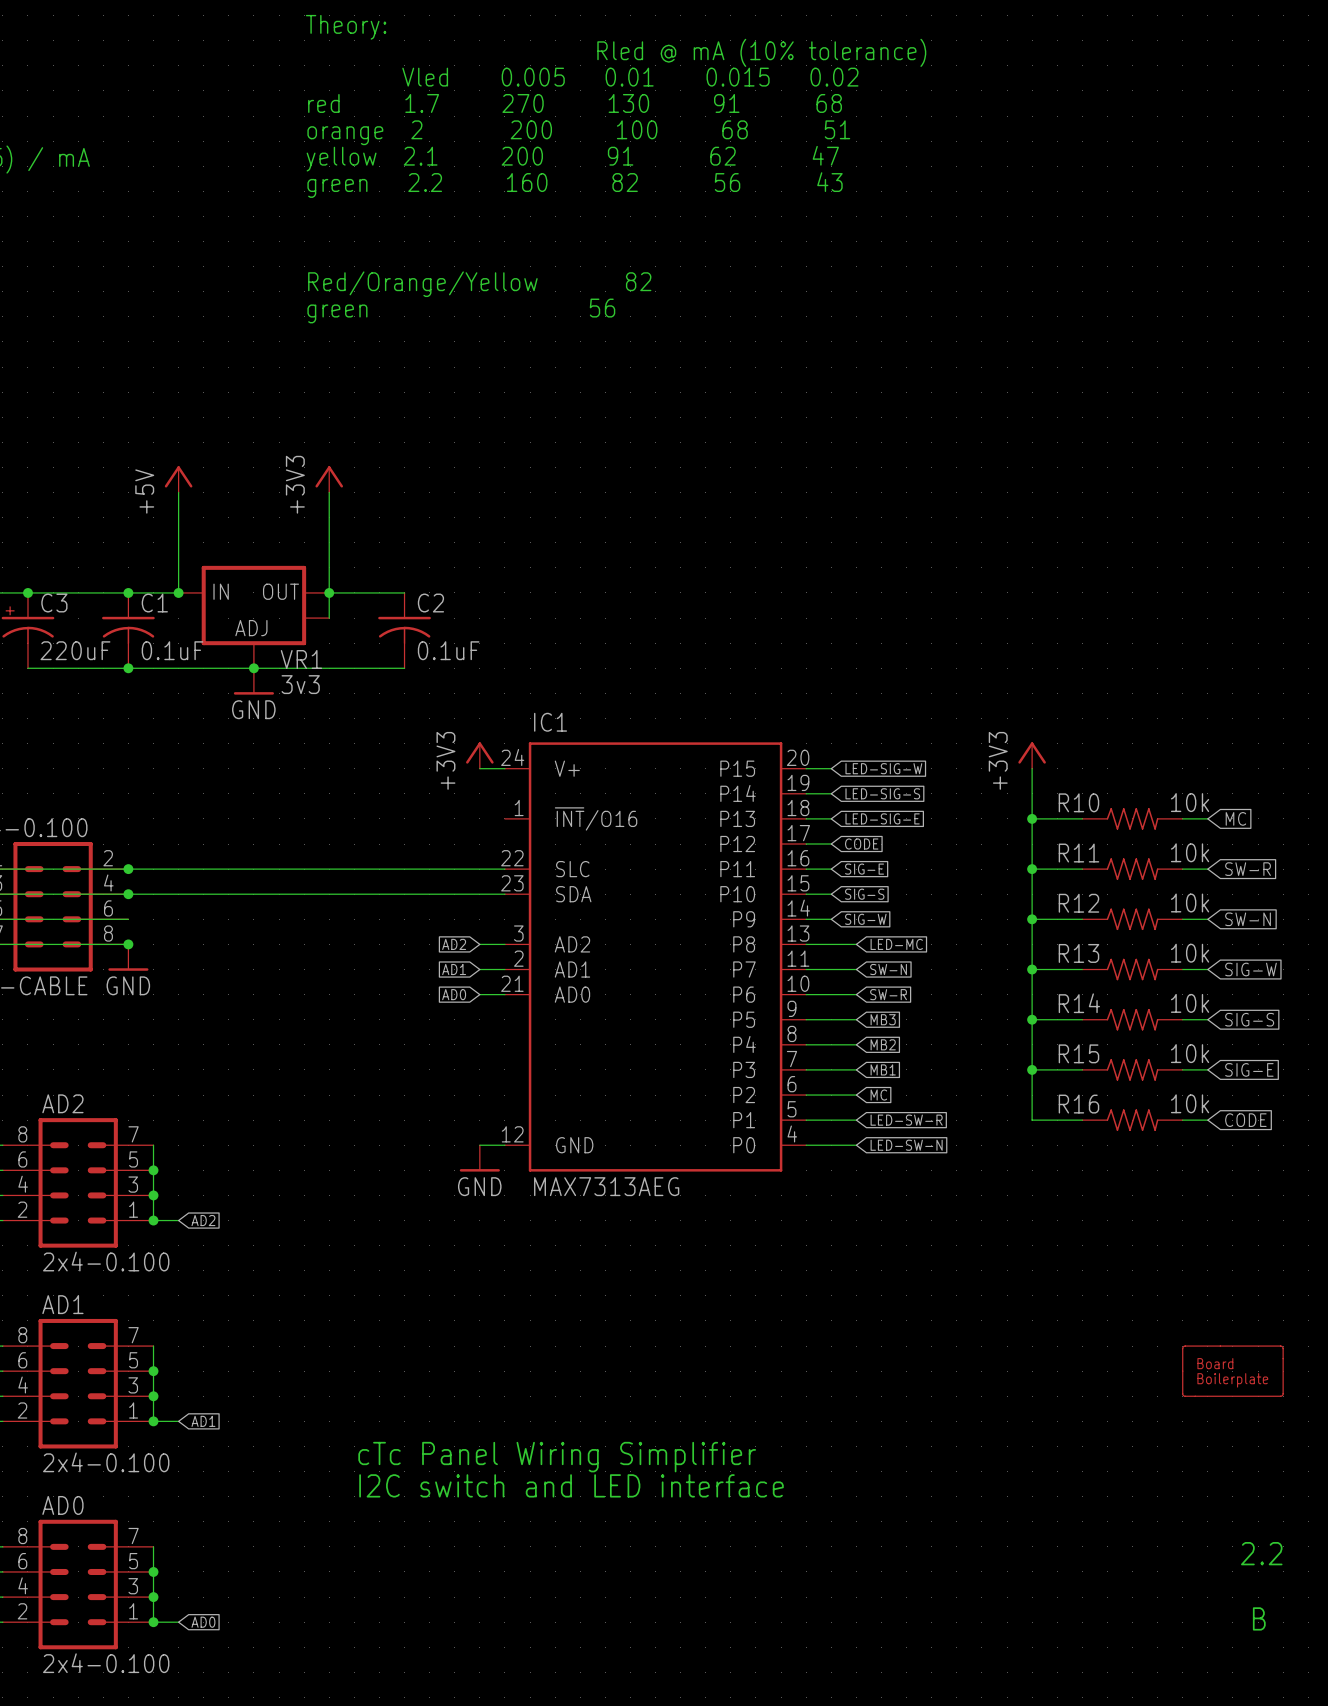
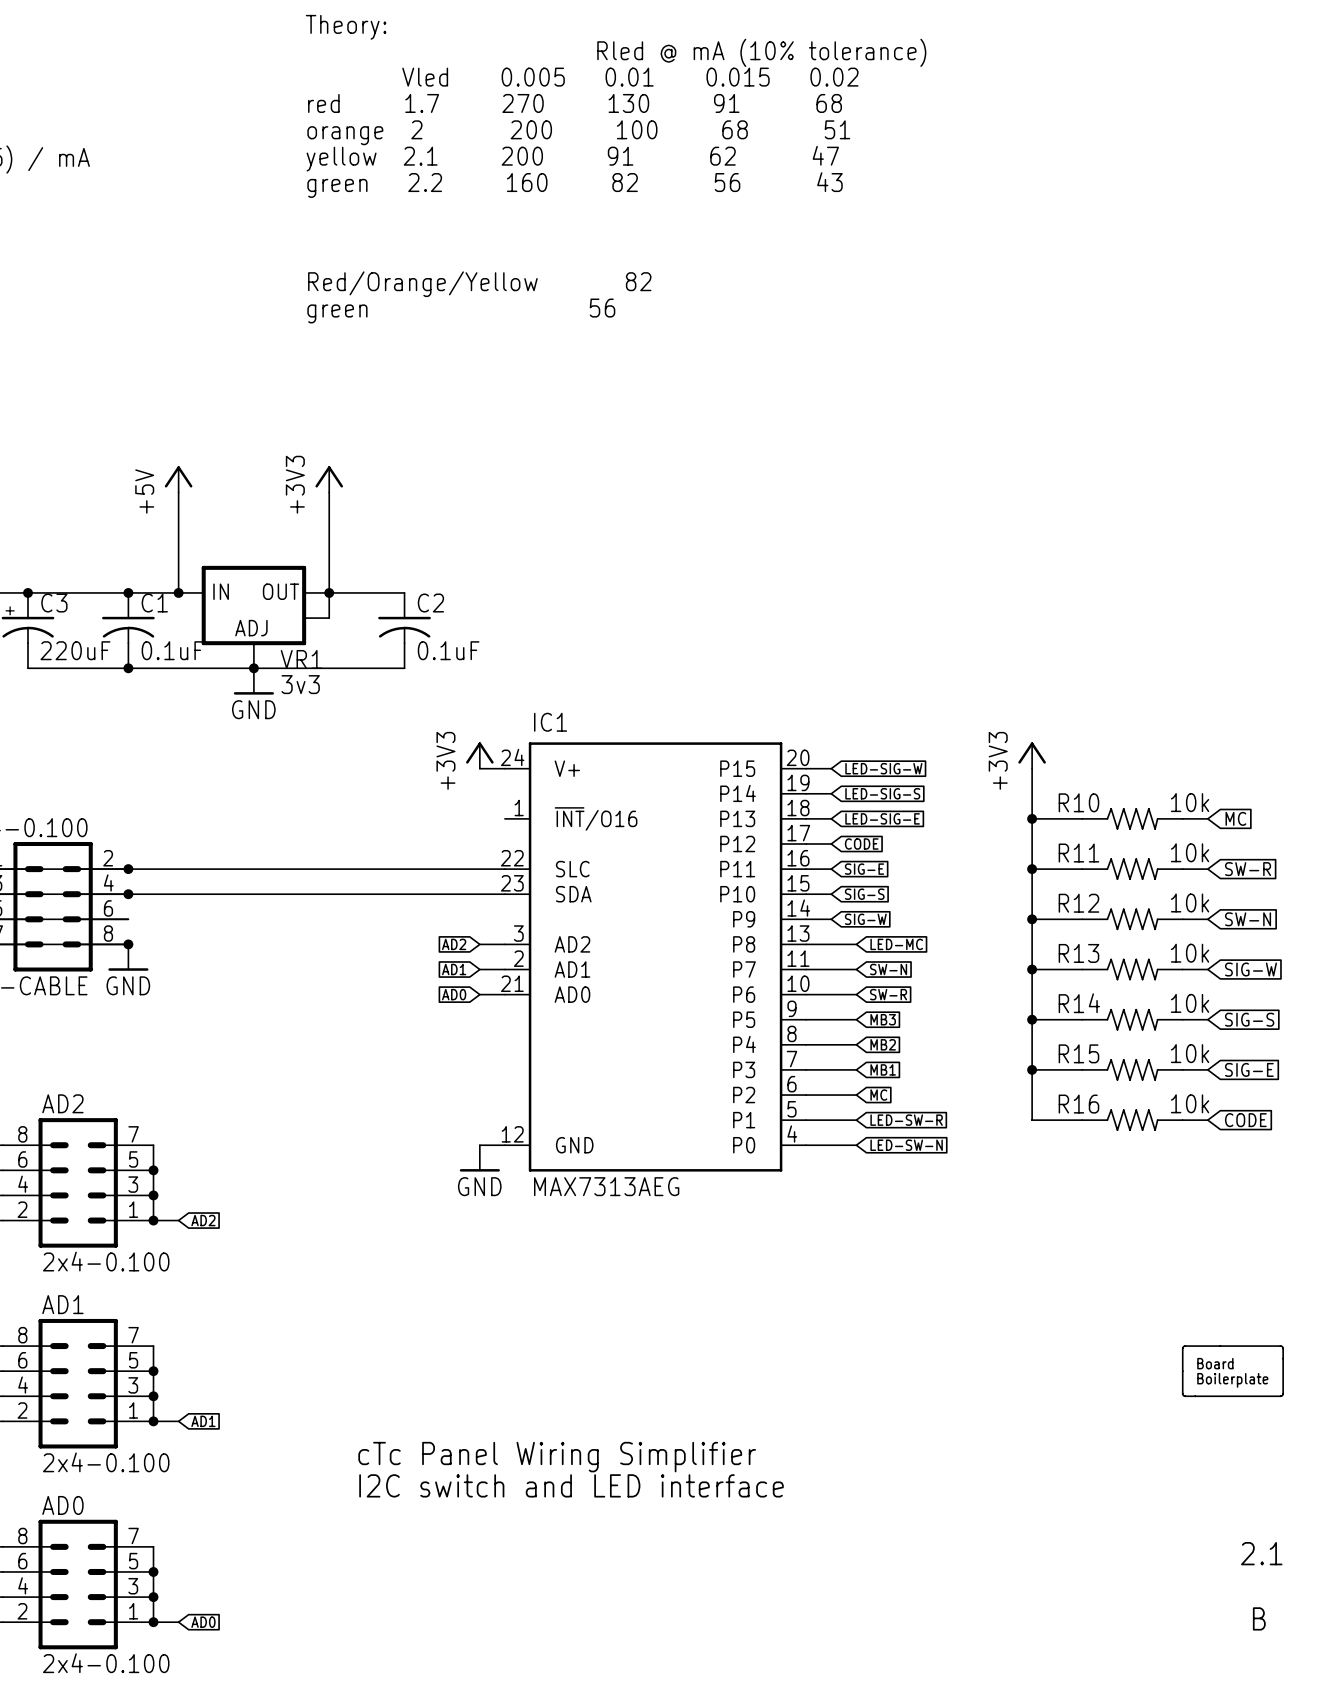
text: 2.2 (1261, 1553) -> 2.1 (1261, 1553)

